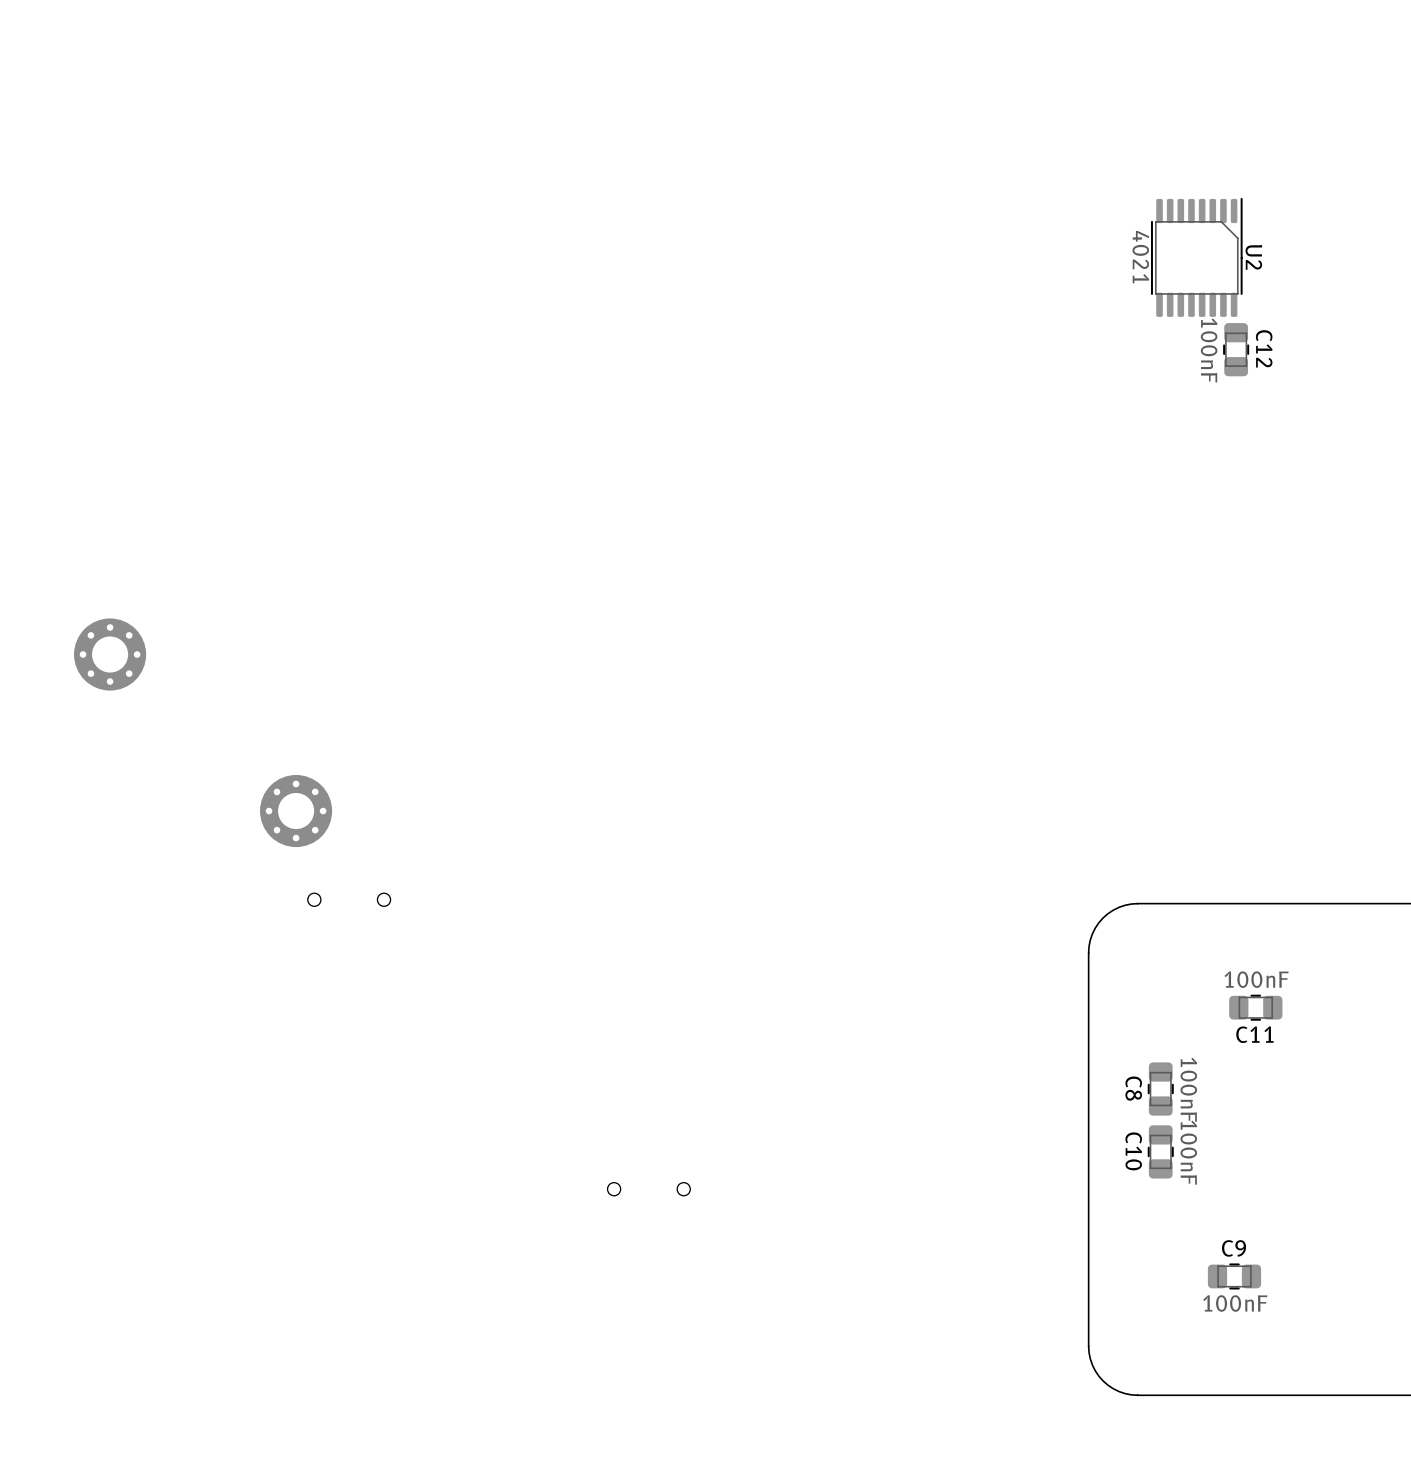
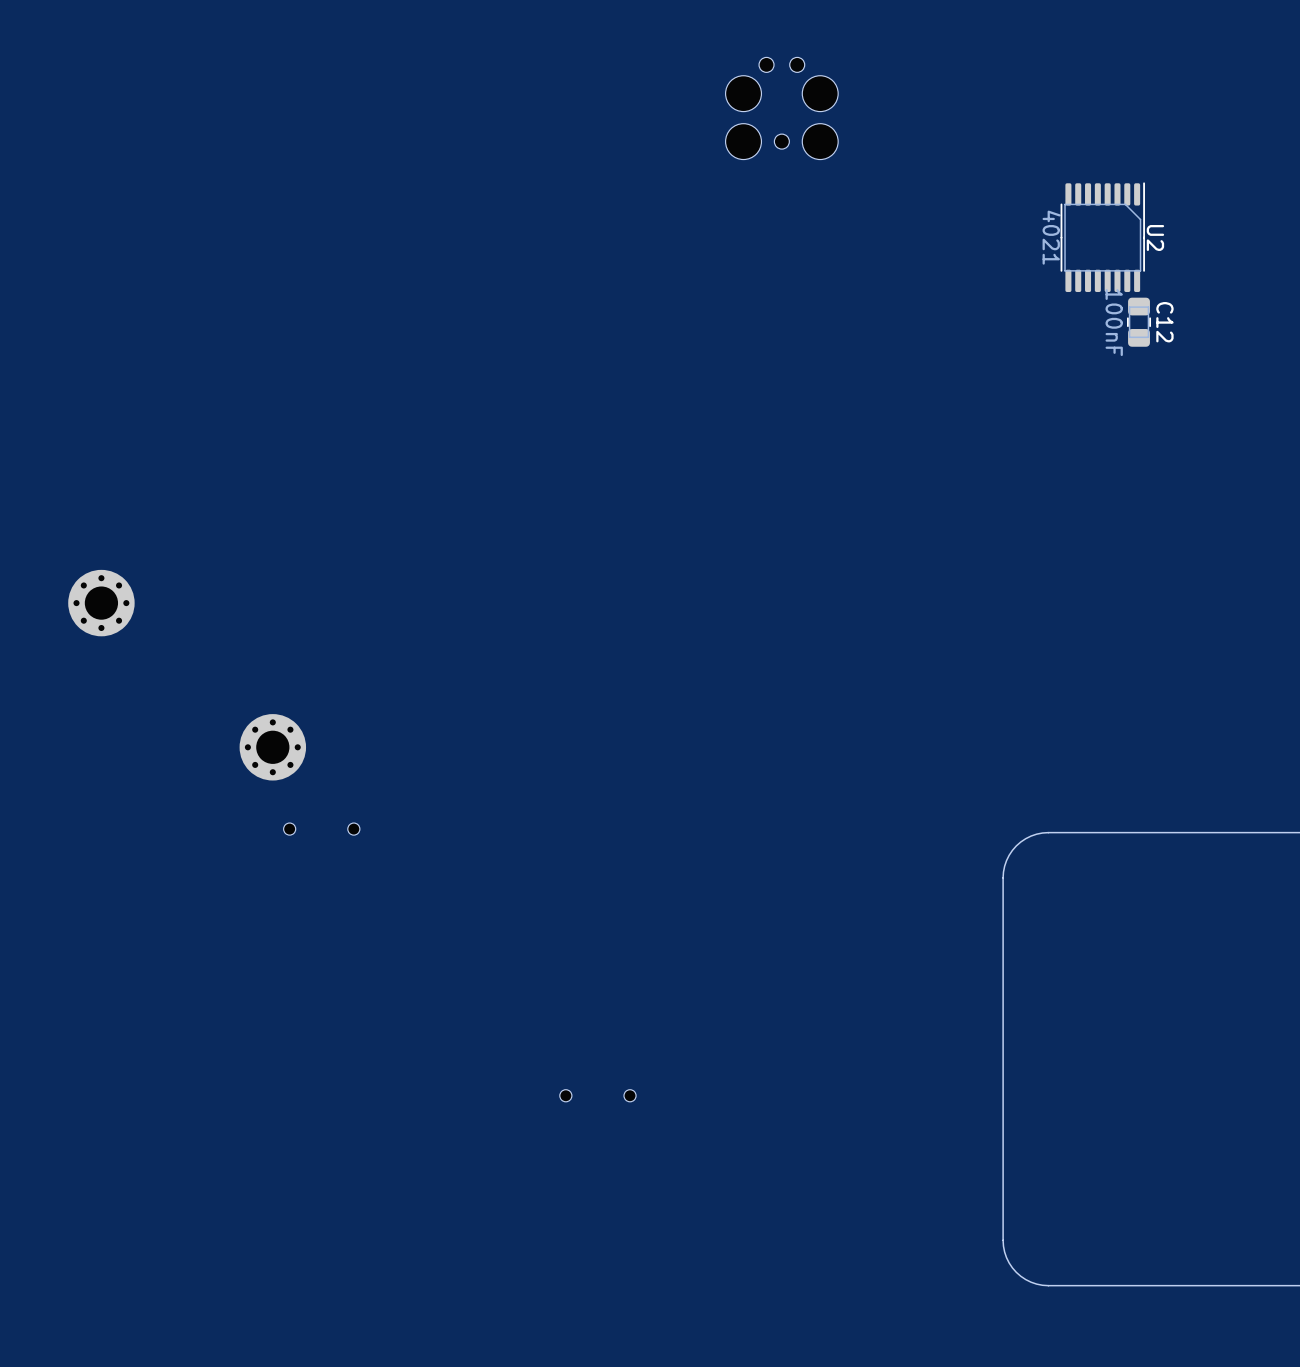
part: none -> (781, 108)
C11: 100nF (1255, 1007) -> none
C8: 100nF (1160, 1089) -> none
C10: 100nF (1160, 1151) -> none
C9: 100nF (1234, 1276) -> none

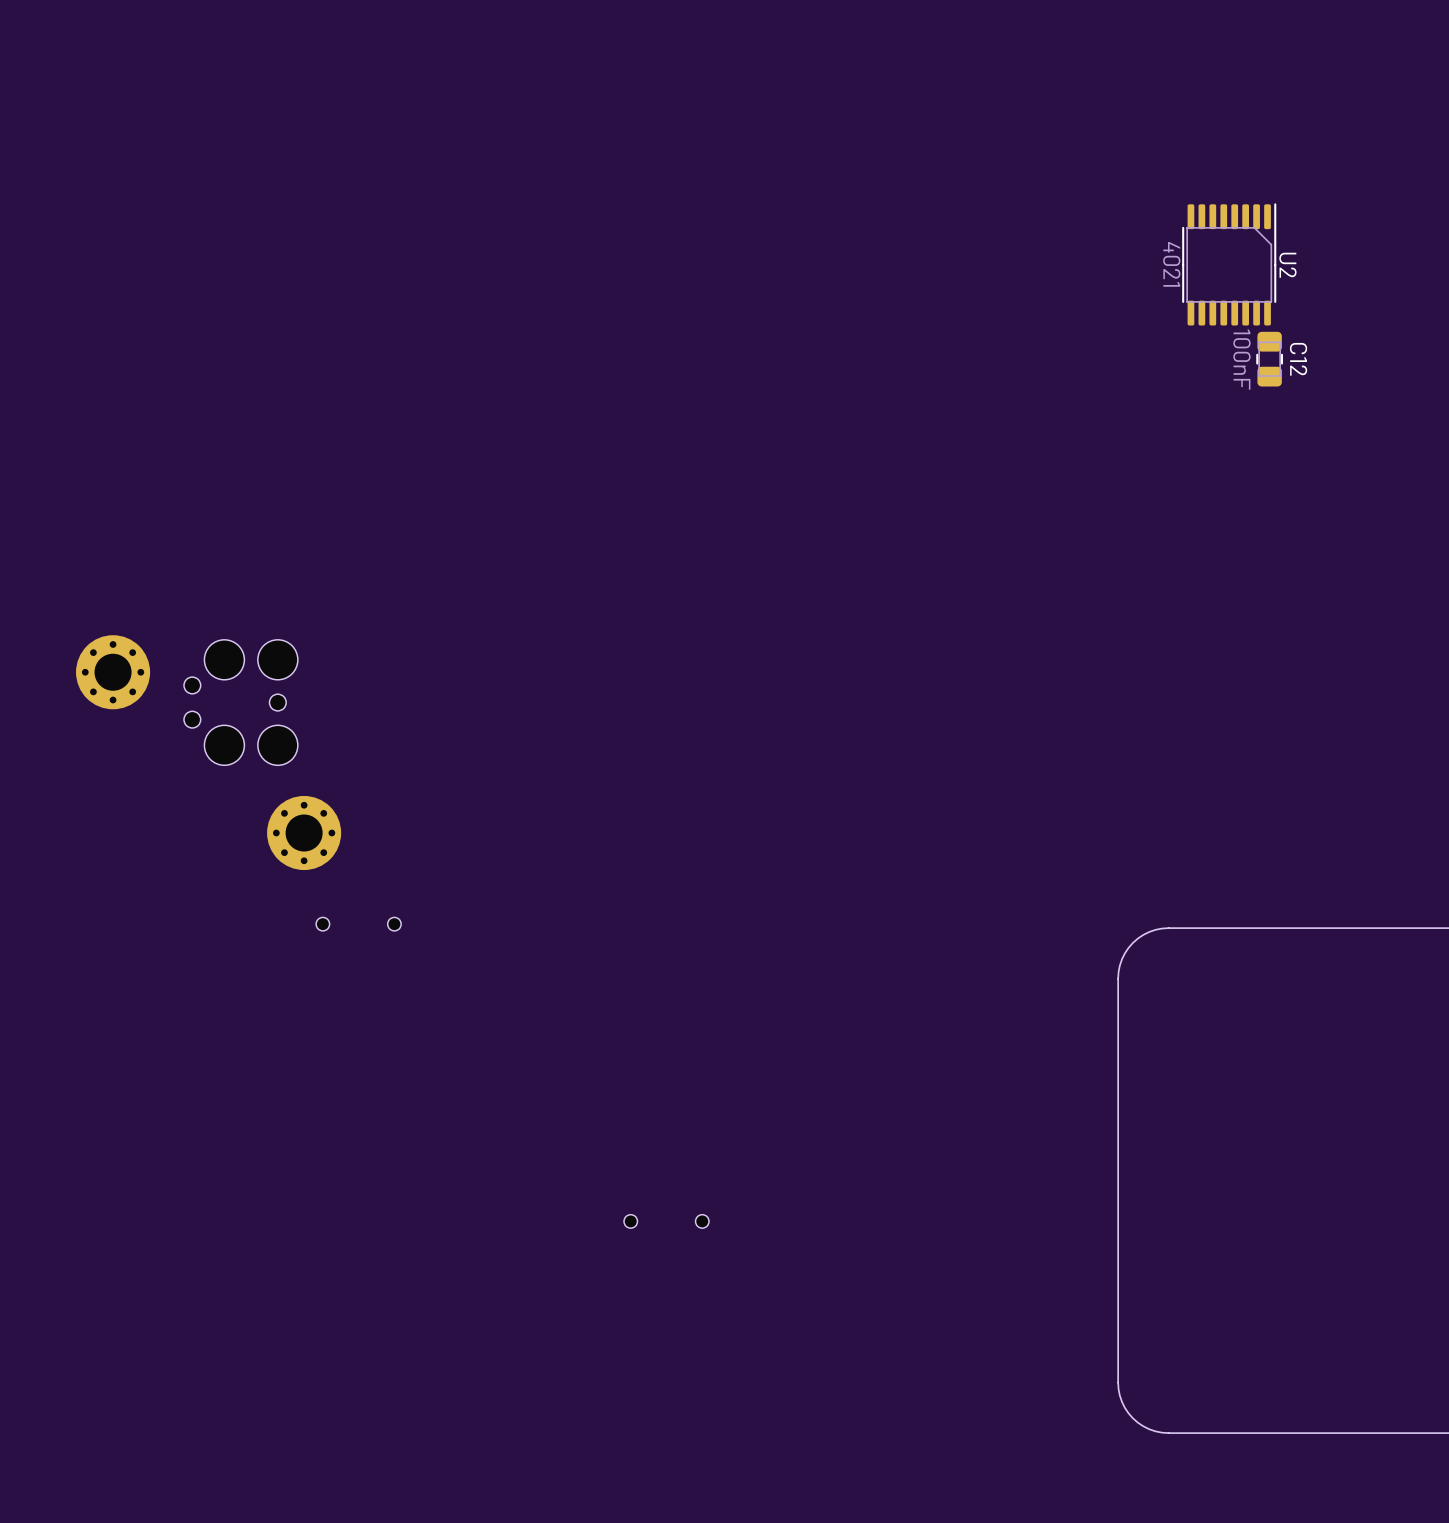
part: (781, 108) -> none
part: none -> (240, 702)

